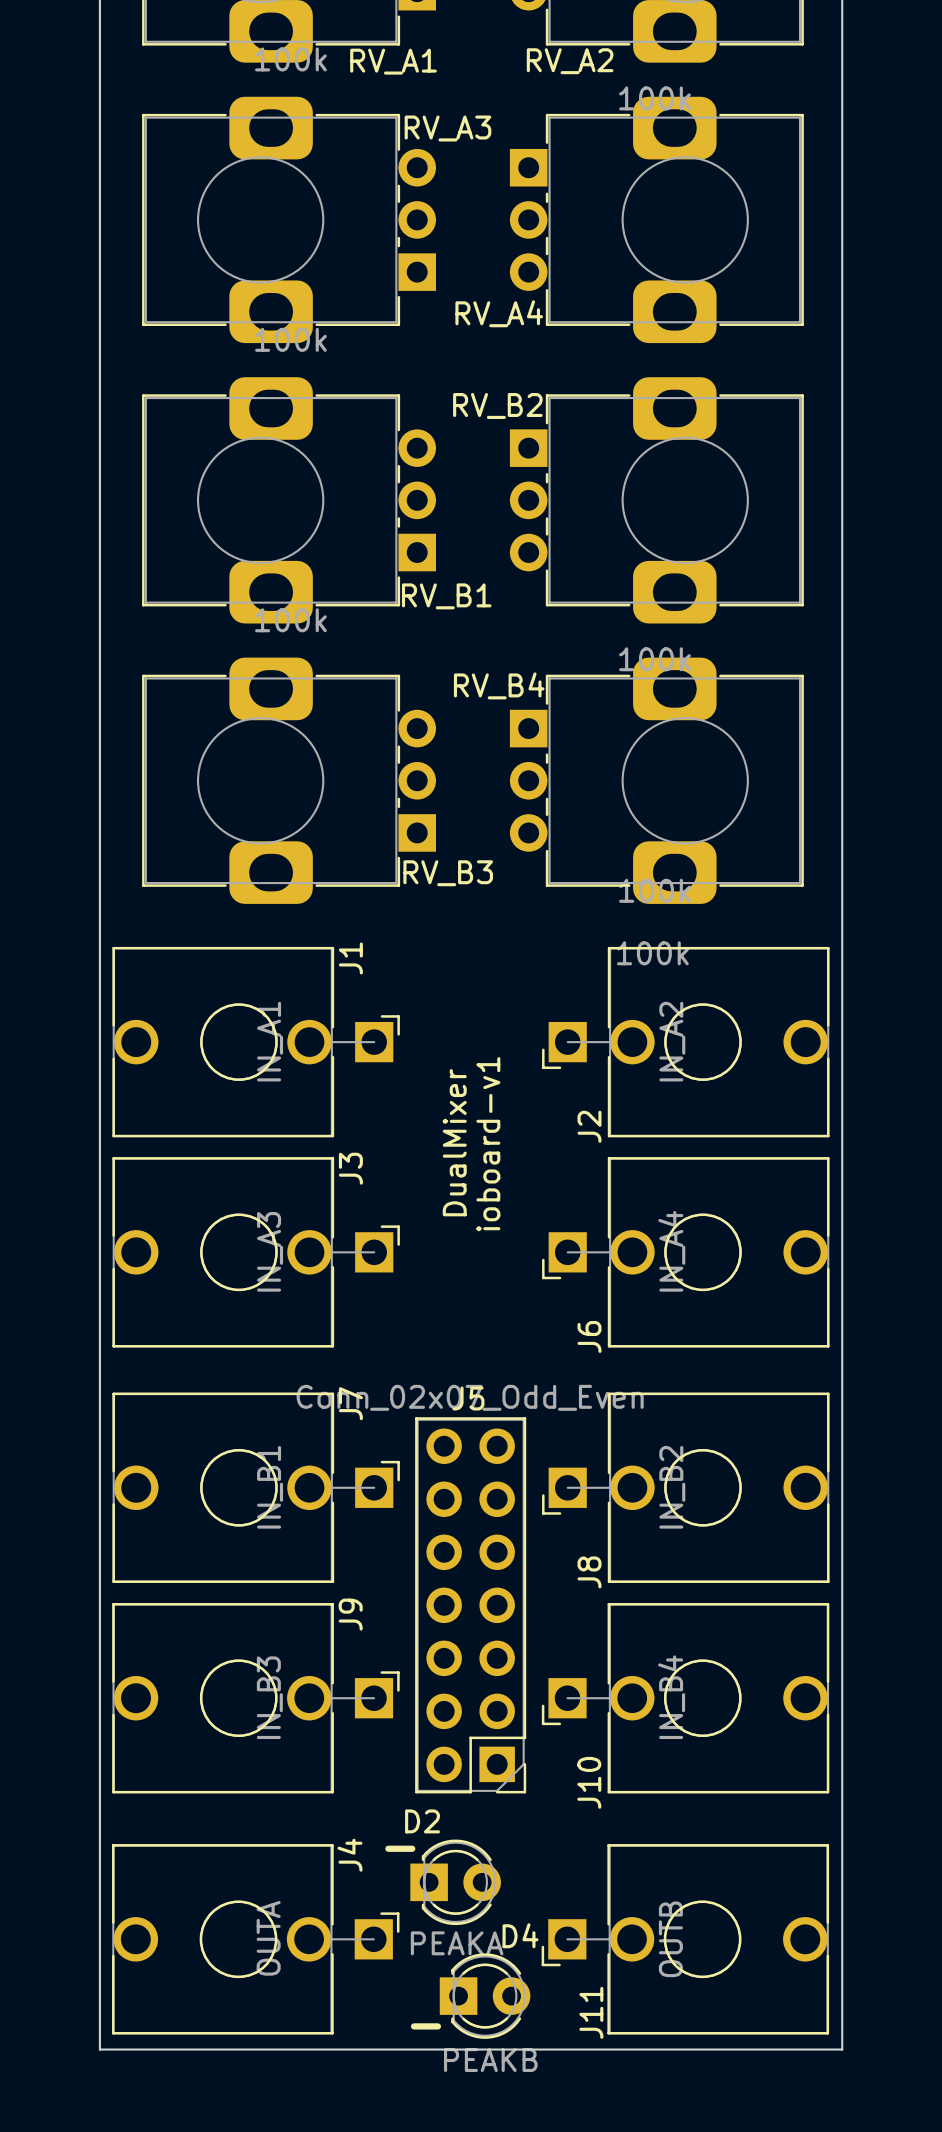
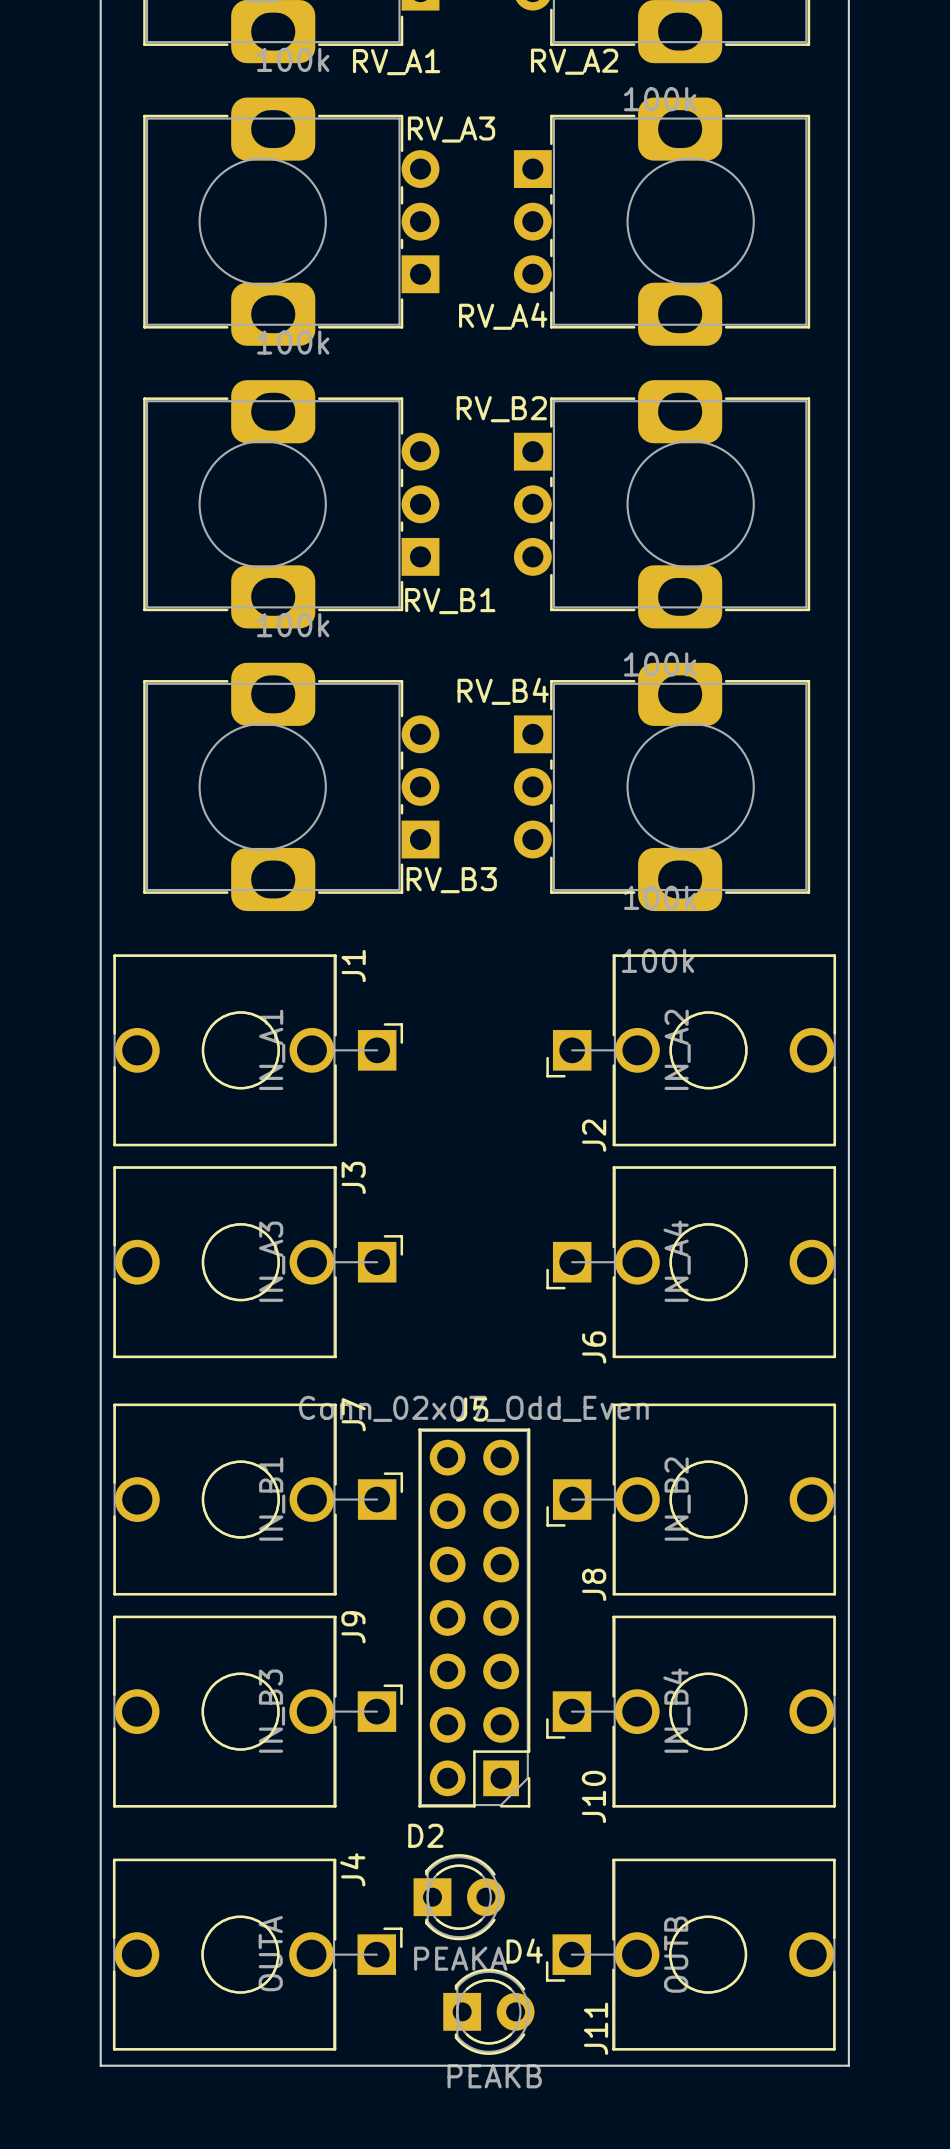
text: DualMixer (454, 1142) -> none
text: ioboard-v1 (488, 1144) -> none
text: - (400, 1848) -> none
text: - (425, 2026) -> none

